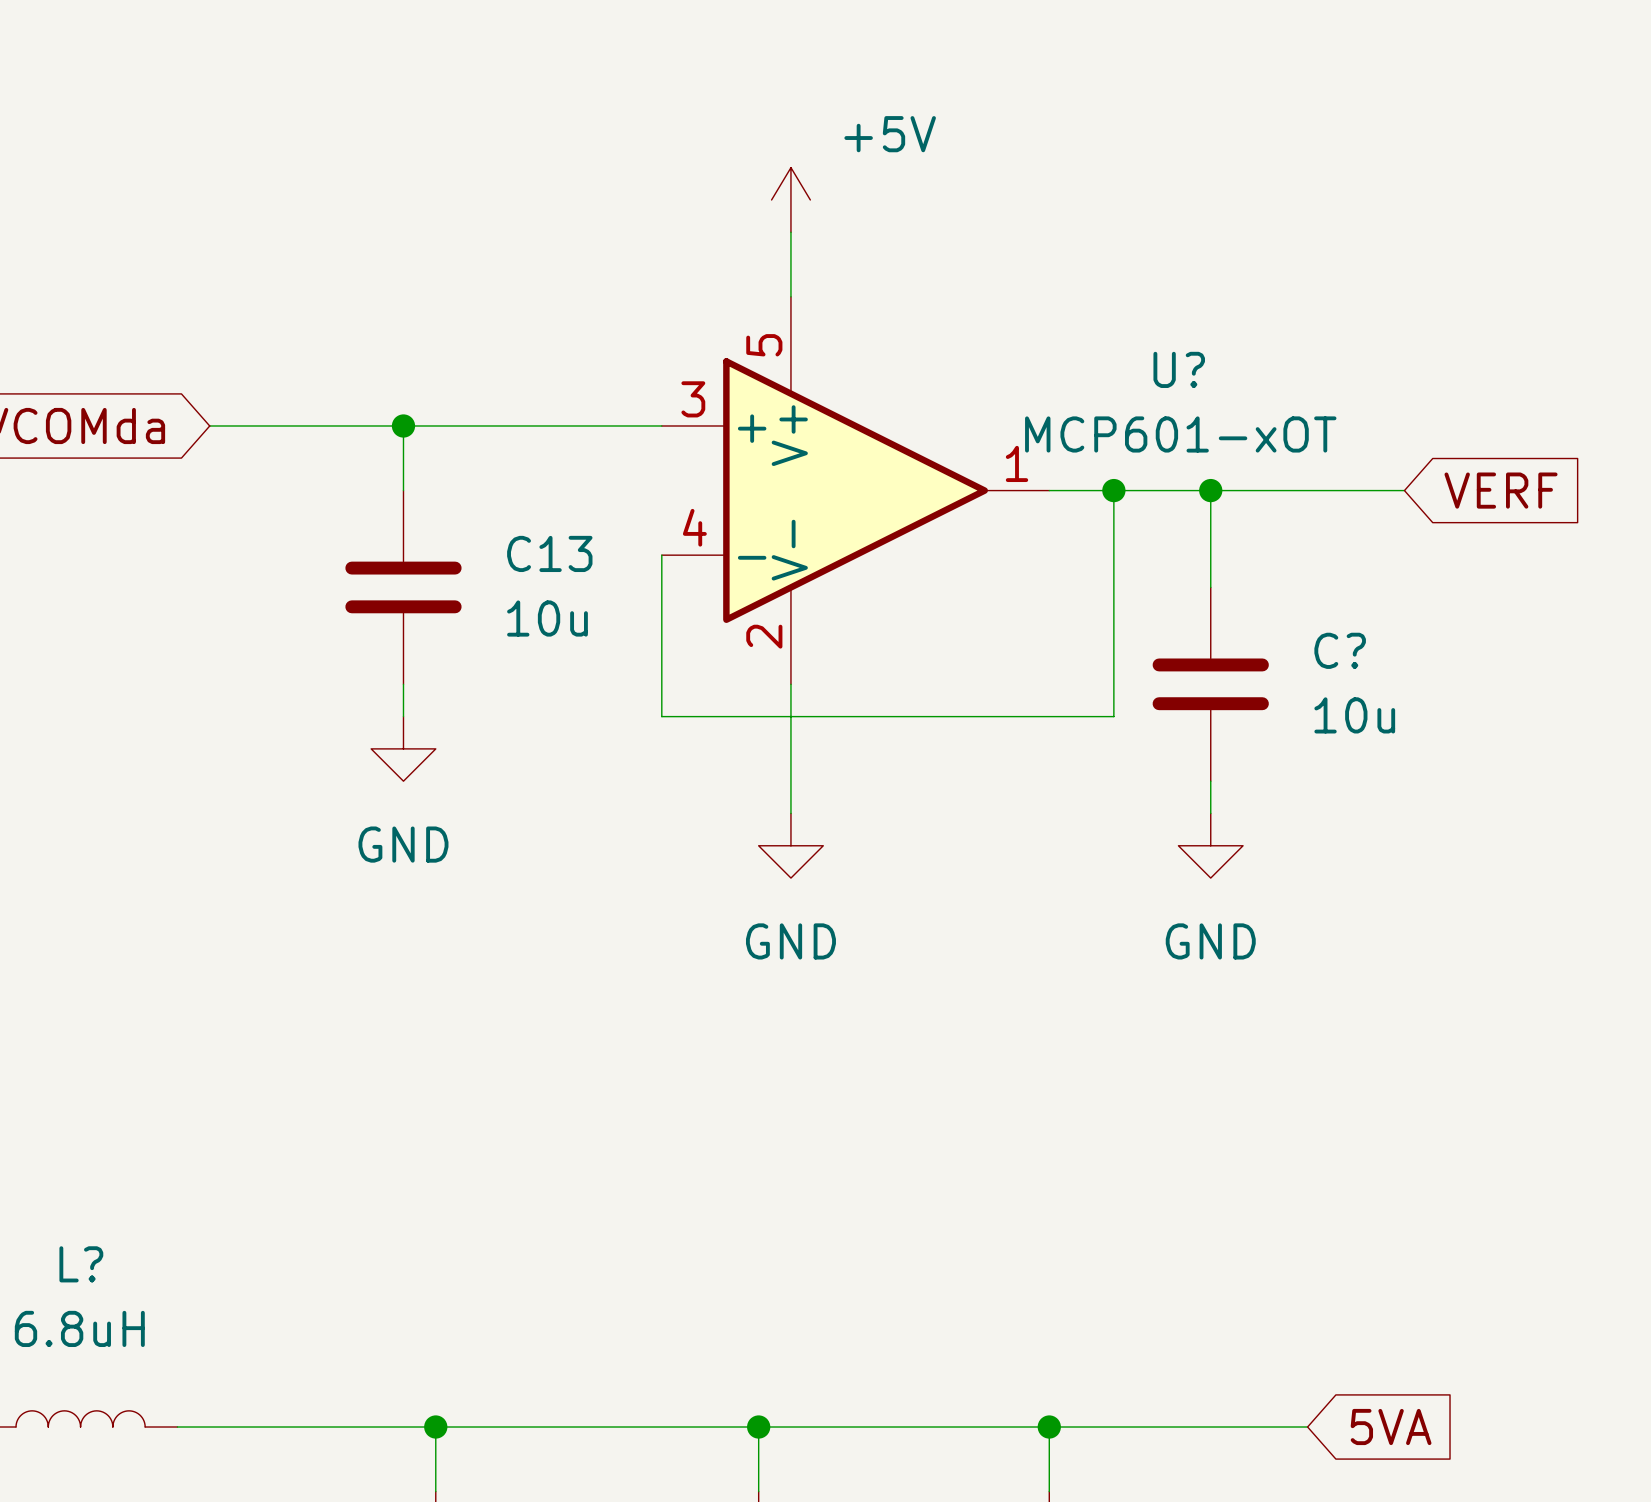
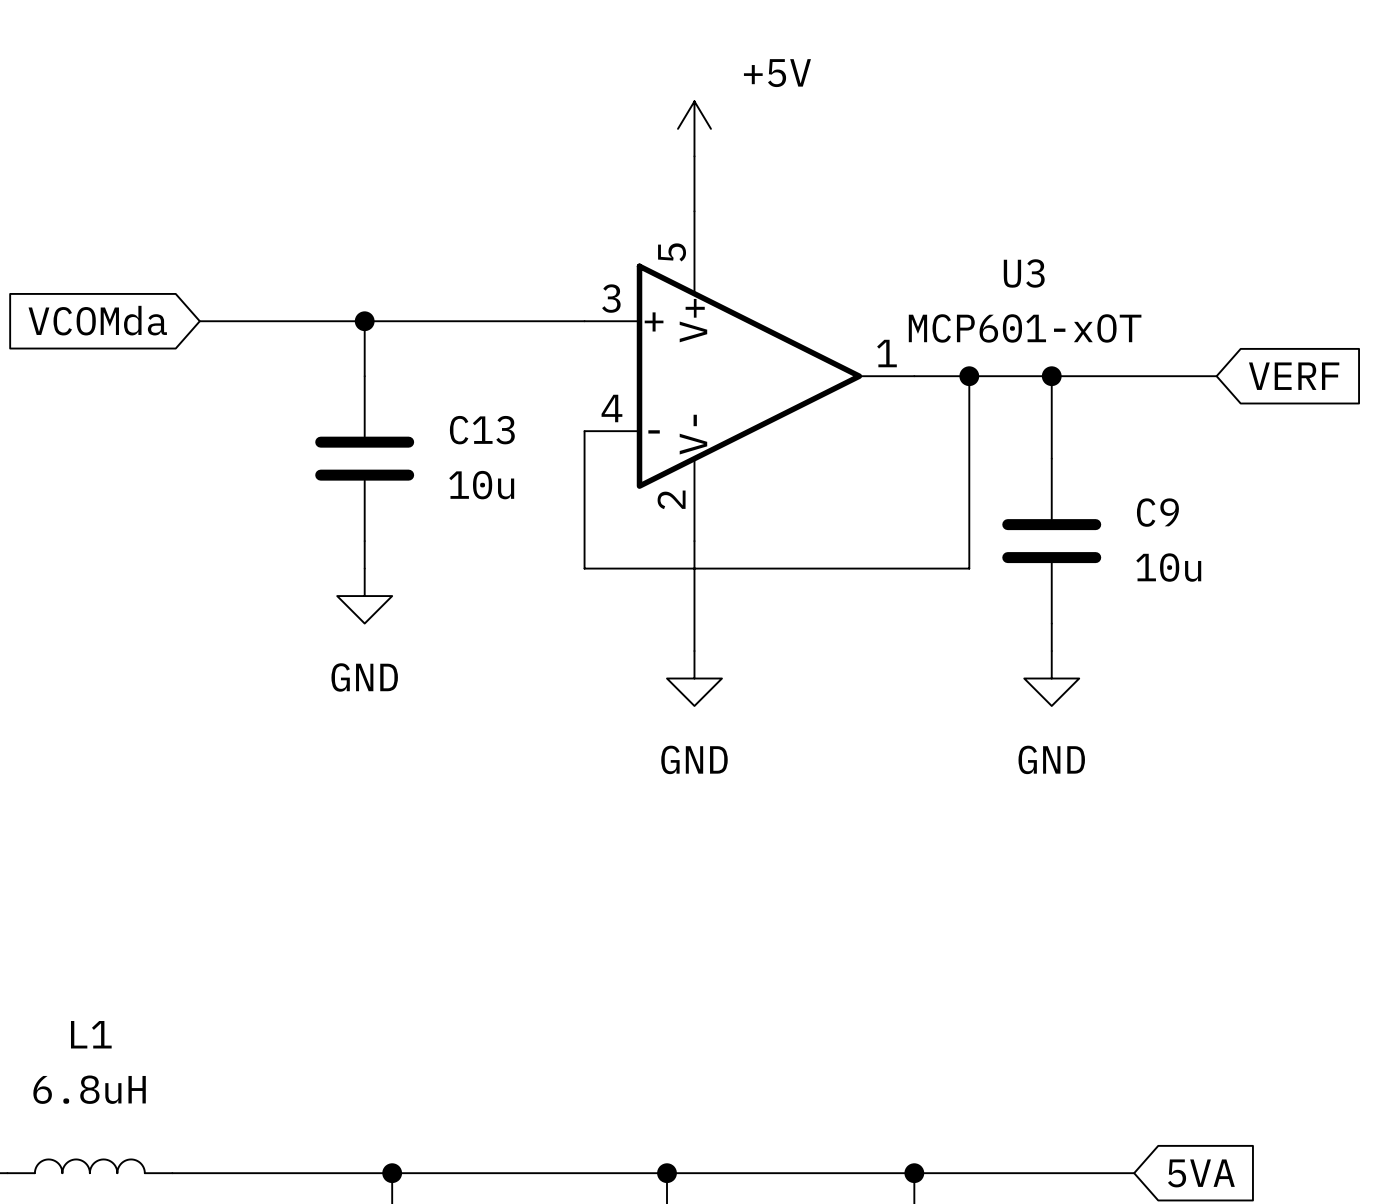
U? name: U? (1179, 369) -> U3 (1024, 273)
C? name: C? (1340, 650) -> C9 (1157, 512)
L? name: L? (81, 1264) -> L1 (91, 1034)

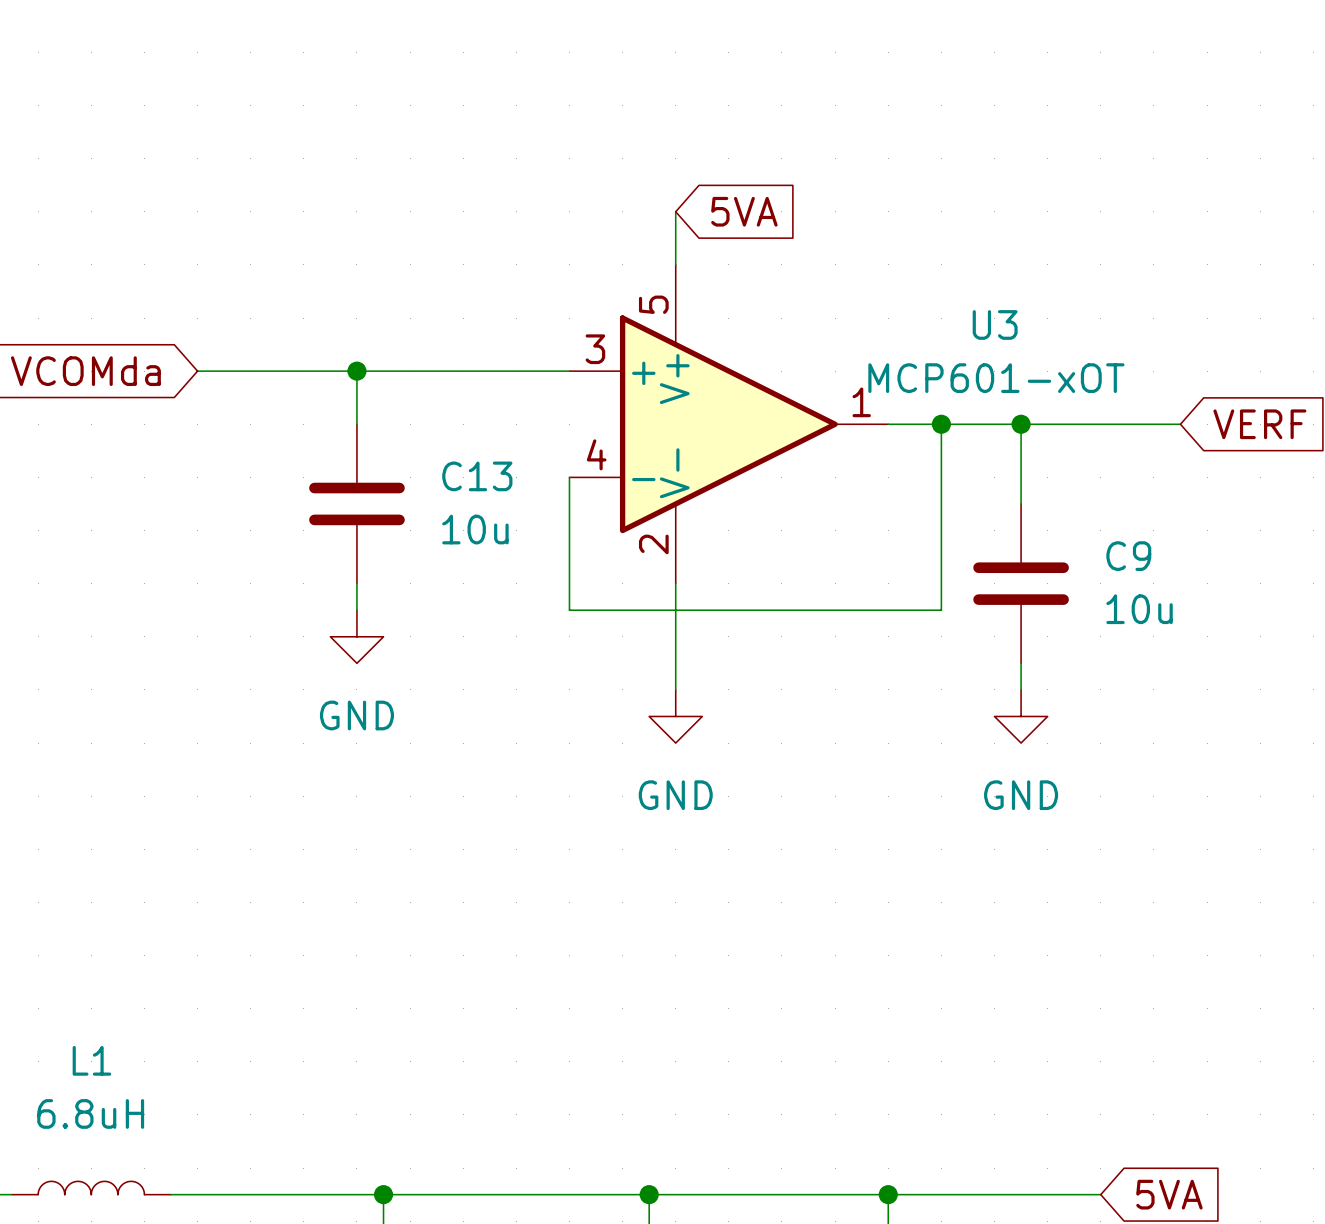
power symbol: +5V (694, 128) -> none
global label: none -> 5VA (744, 211)

